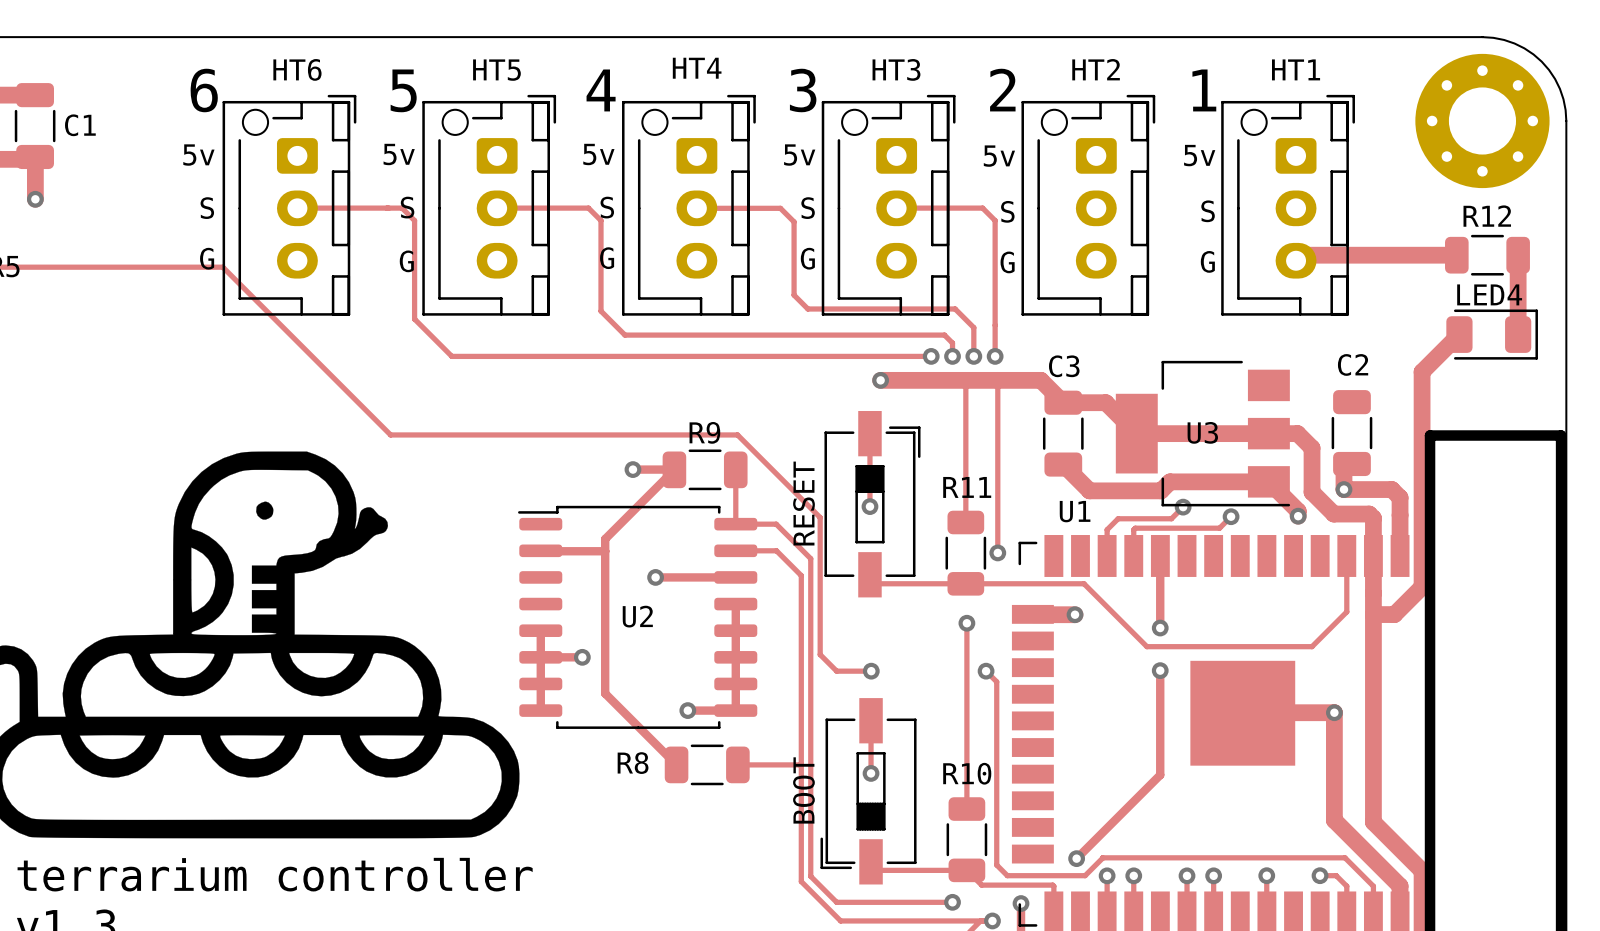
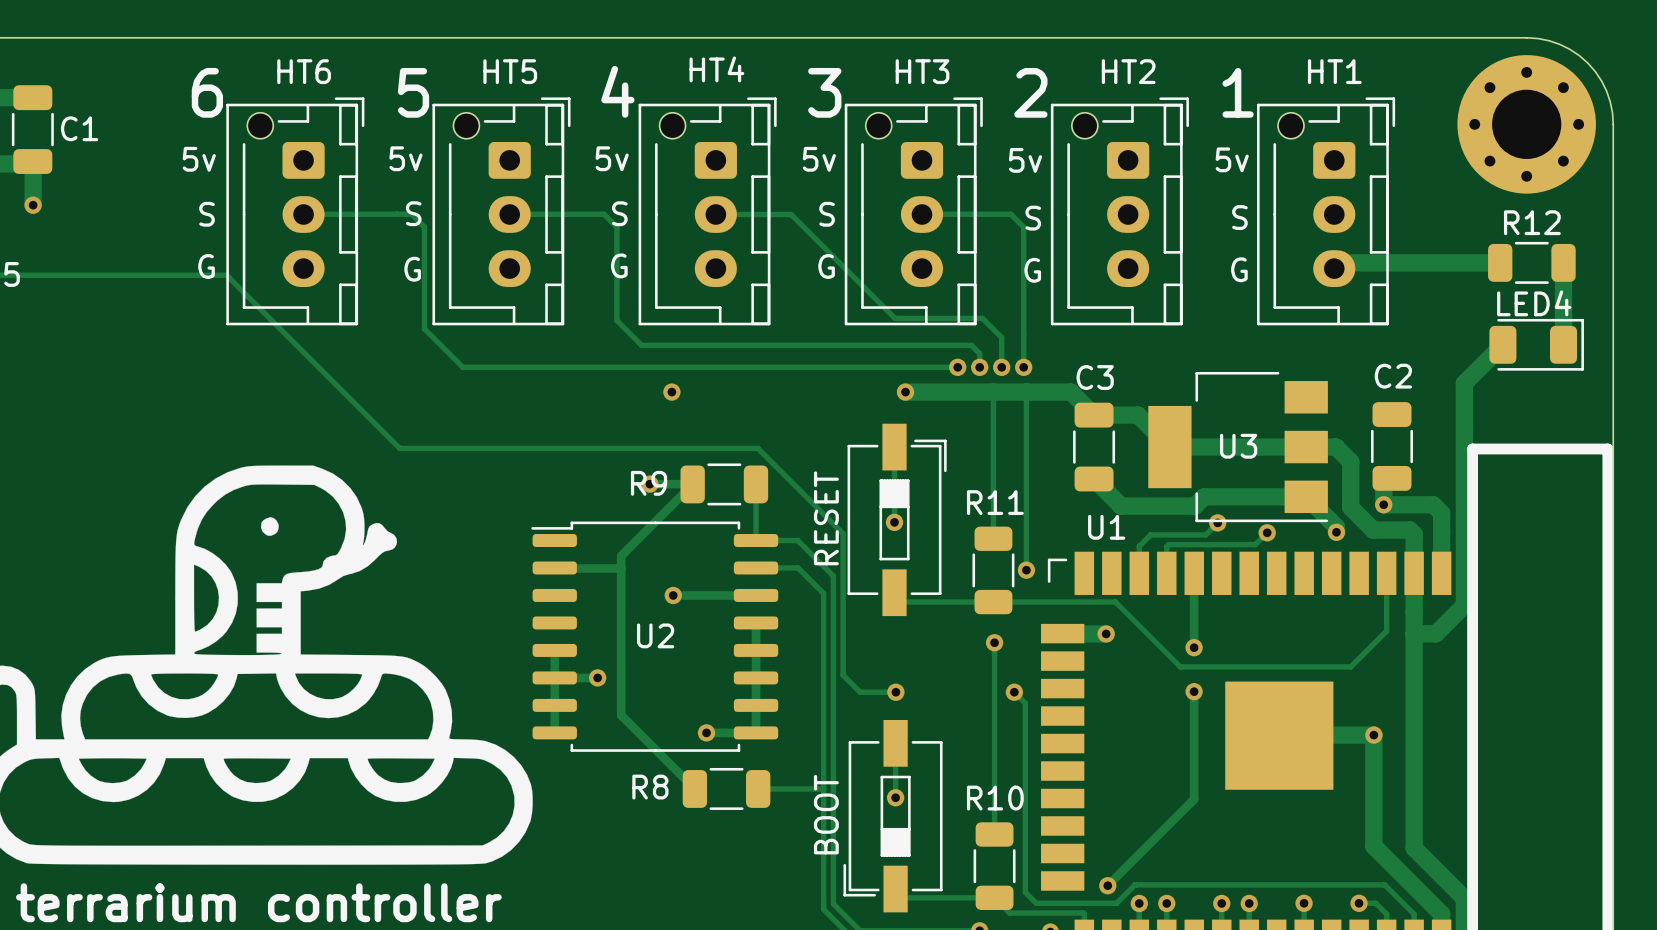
track: (769, 208) (780, 208) (794, 221) (794, 295) (807, 309) (870, 309) -> (791, 214) (895, 318)
via: none -> (671, 392)
R9 name position: R9 (704, 432) -> R9 (649, 483)

